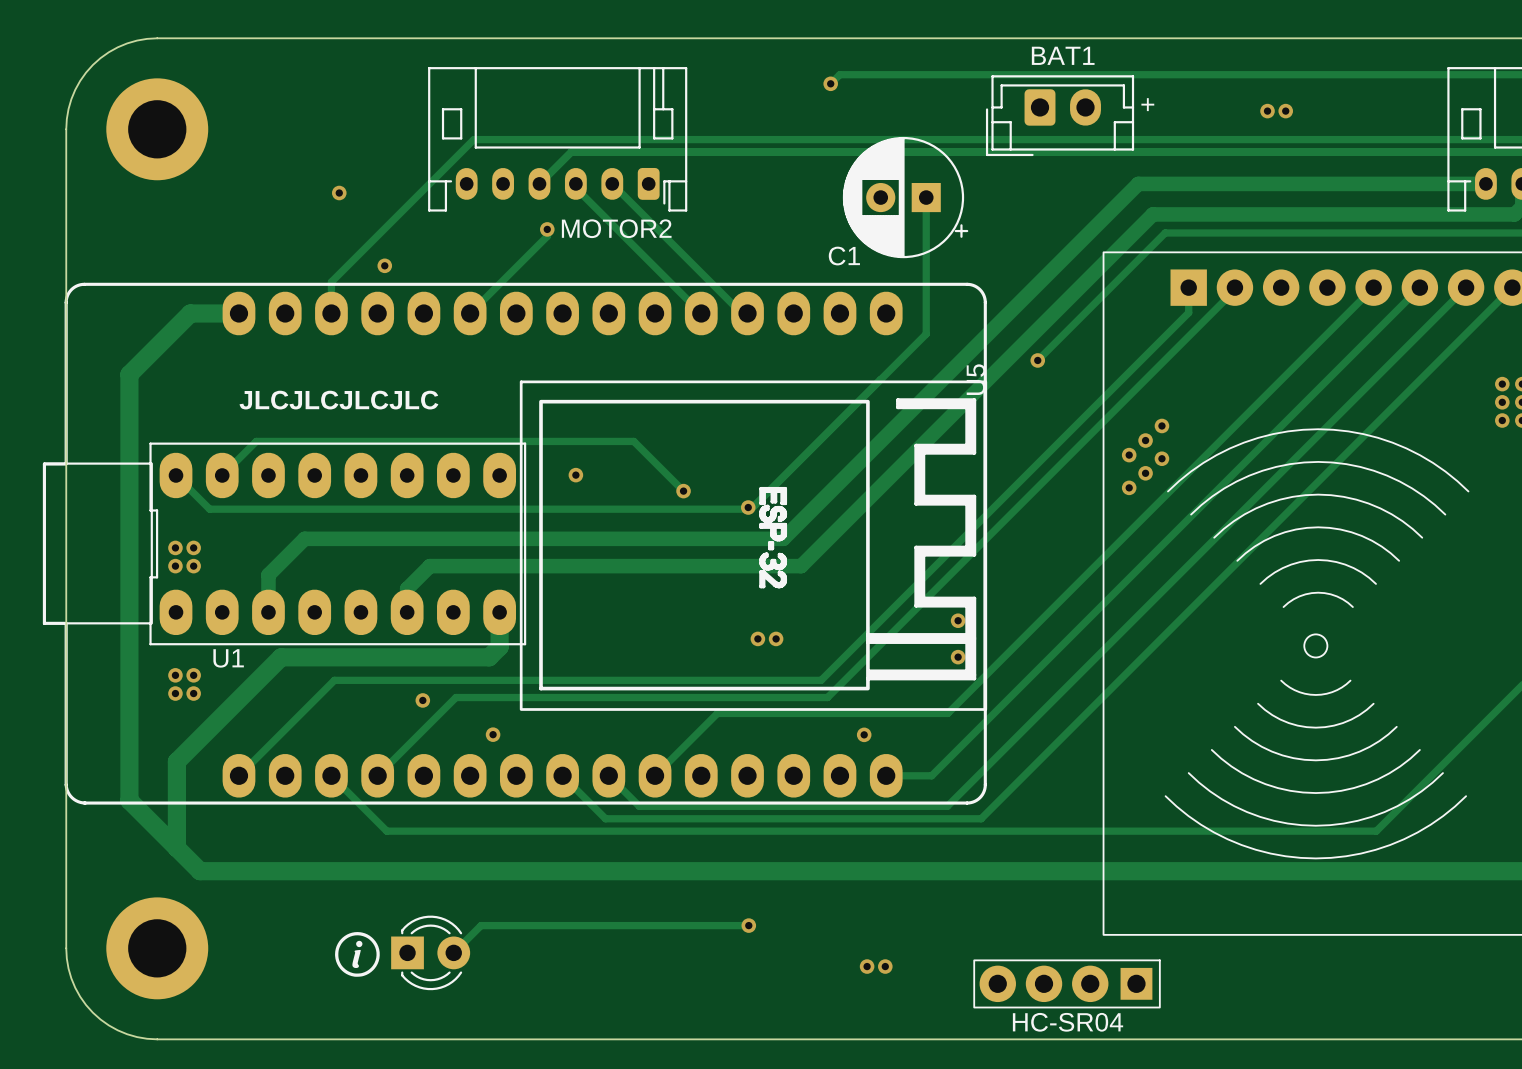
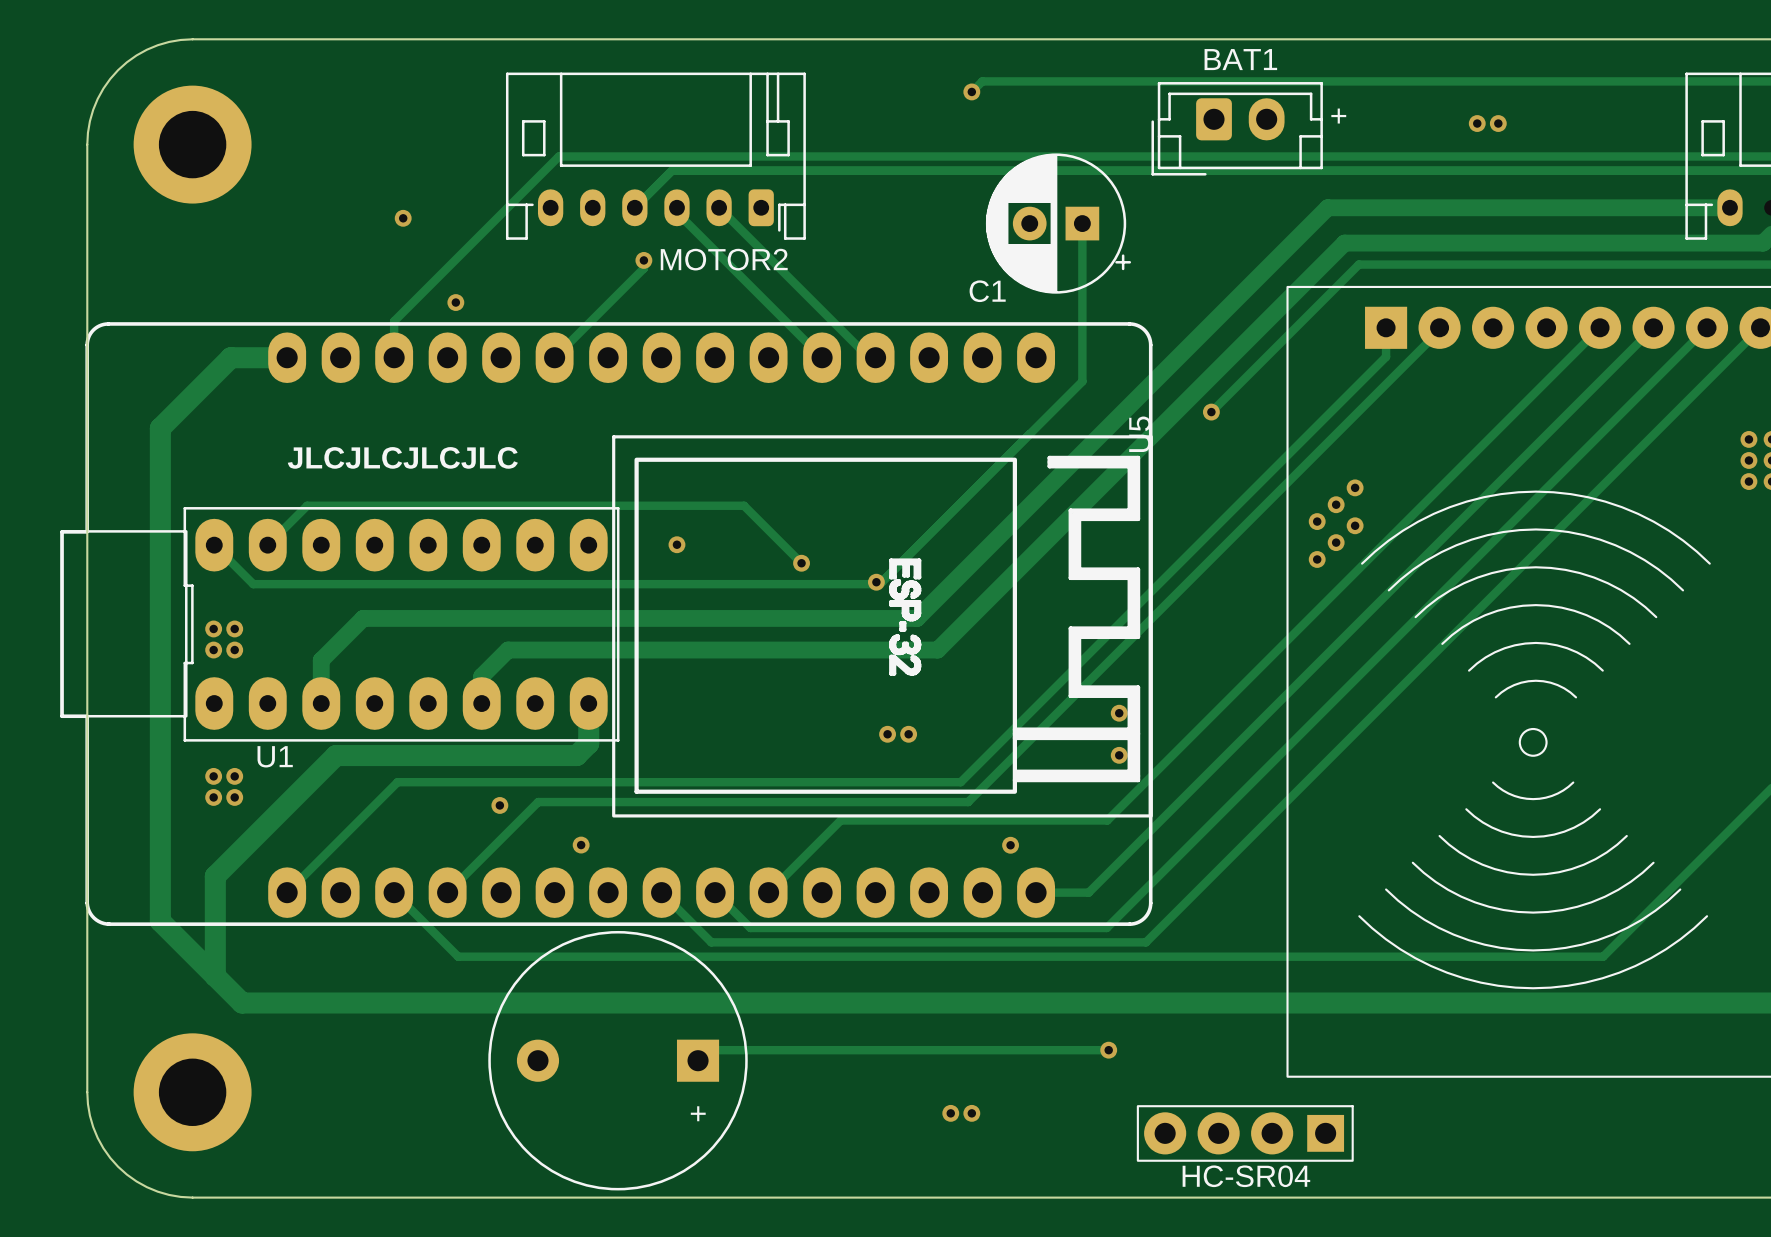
track: none -> (1108, 1050) (708, 1050) (698, 1060)
via: none -> (1108, 1050)
part: none -> (618, 1060)
track: (748, 925) (481, 925) (453, 952) -> none
via: (748, 925) -> none
drawing: [335, 932, 380, 977] -> none
part: (430, 952) -> none
via: none -> (950, 1113)
via: none -> (971, 1113)
via: (867, 966) -> none
via: (885, 966) -> none
part value: none -> HC-SR04 (1246, 1176)
part text: HC-SR04 (1068, 1022) -> none

